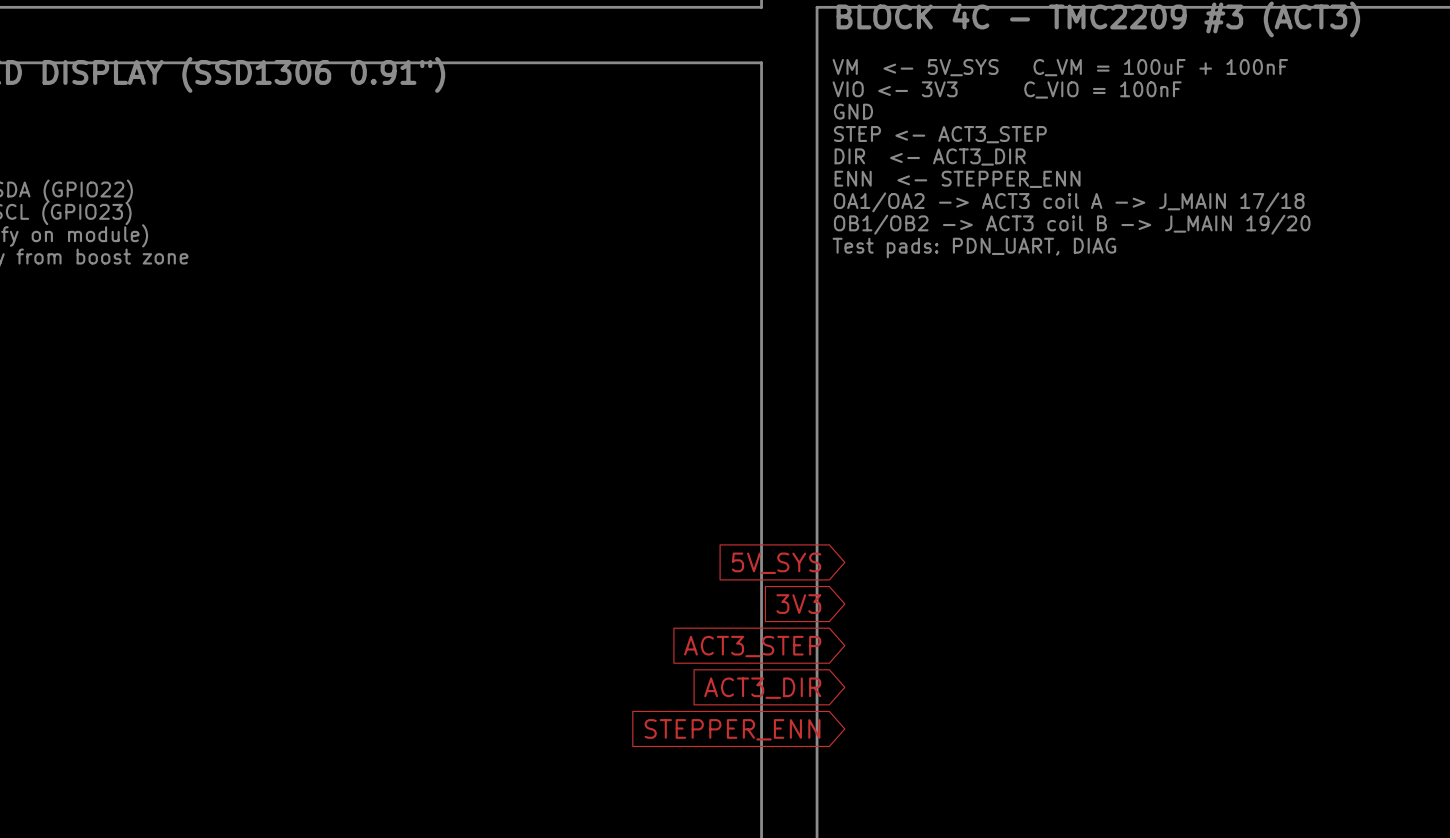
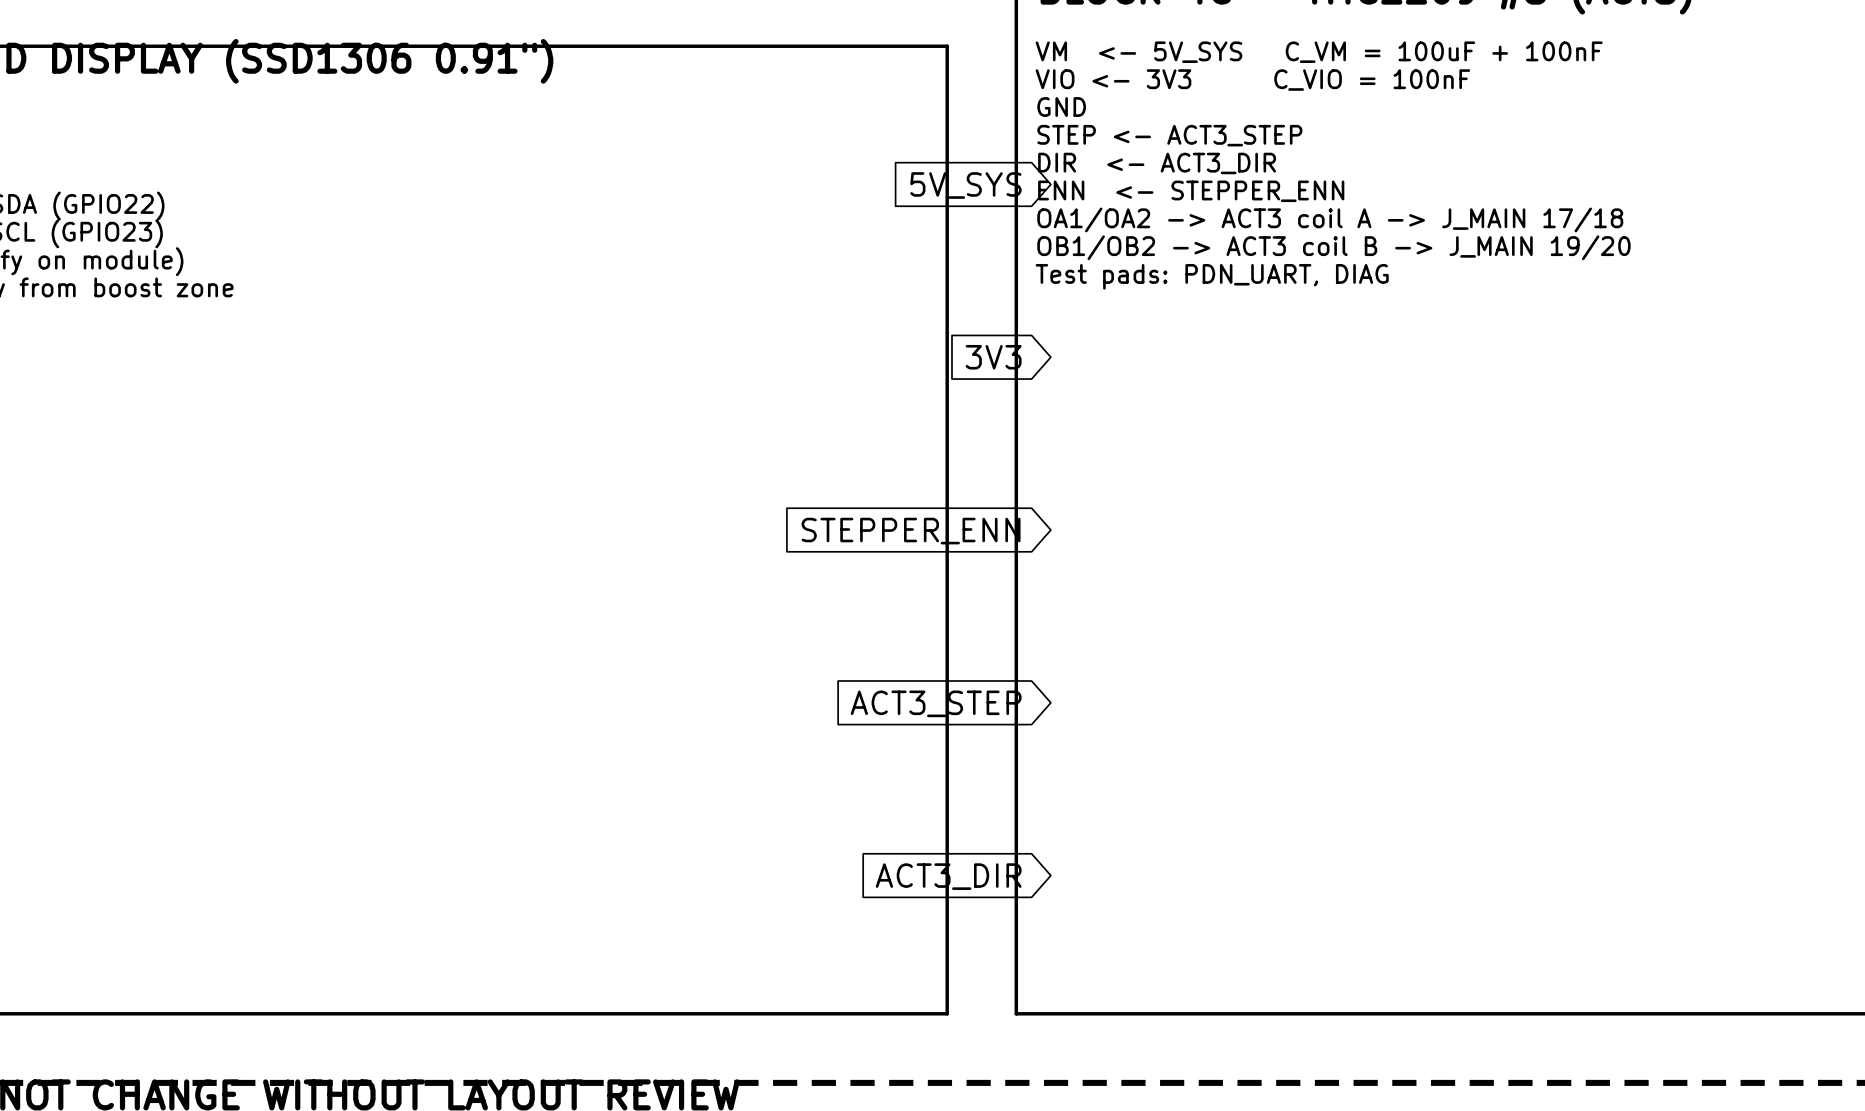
global label: none -> 5V_SYS (965, 185)
global label: none -> STEPPER_ENN (911, 531)
global label: 5V_SYS (776, 563) -> none
global label position: 3V3 (798, 604) -> 3V3 (993, 357)
global label position: ACT3_STEP (752, 646) -> ACT3_STEP (936, 703)
global label: ACT3_DIR (762, 688) -> none
global label: STEPPER_ENN (732, 729) -> ACT3_DIR (948, 876)

